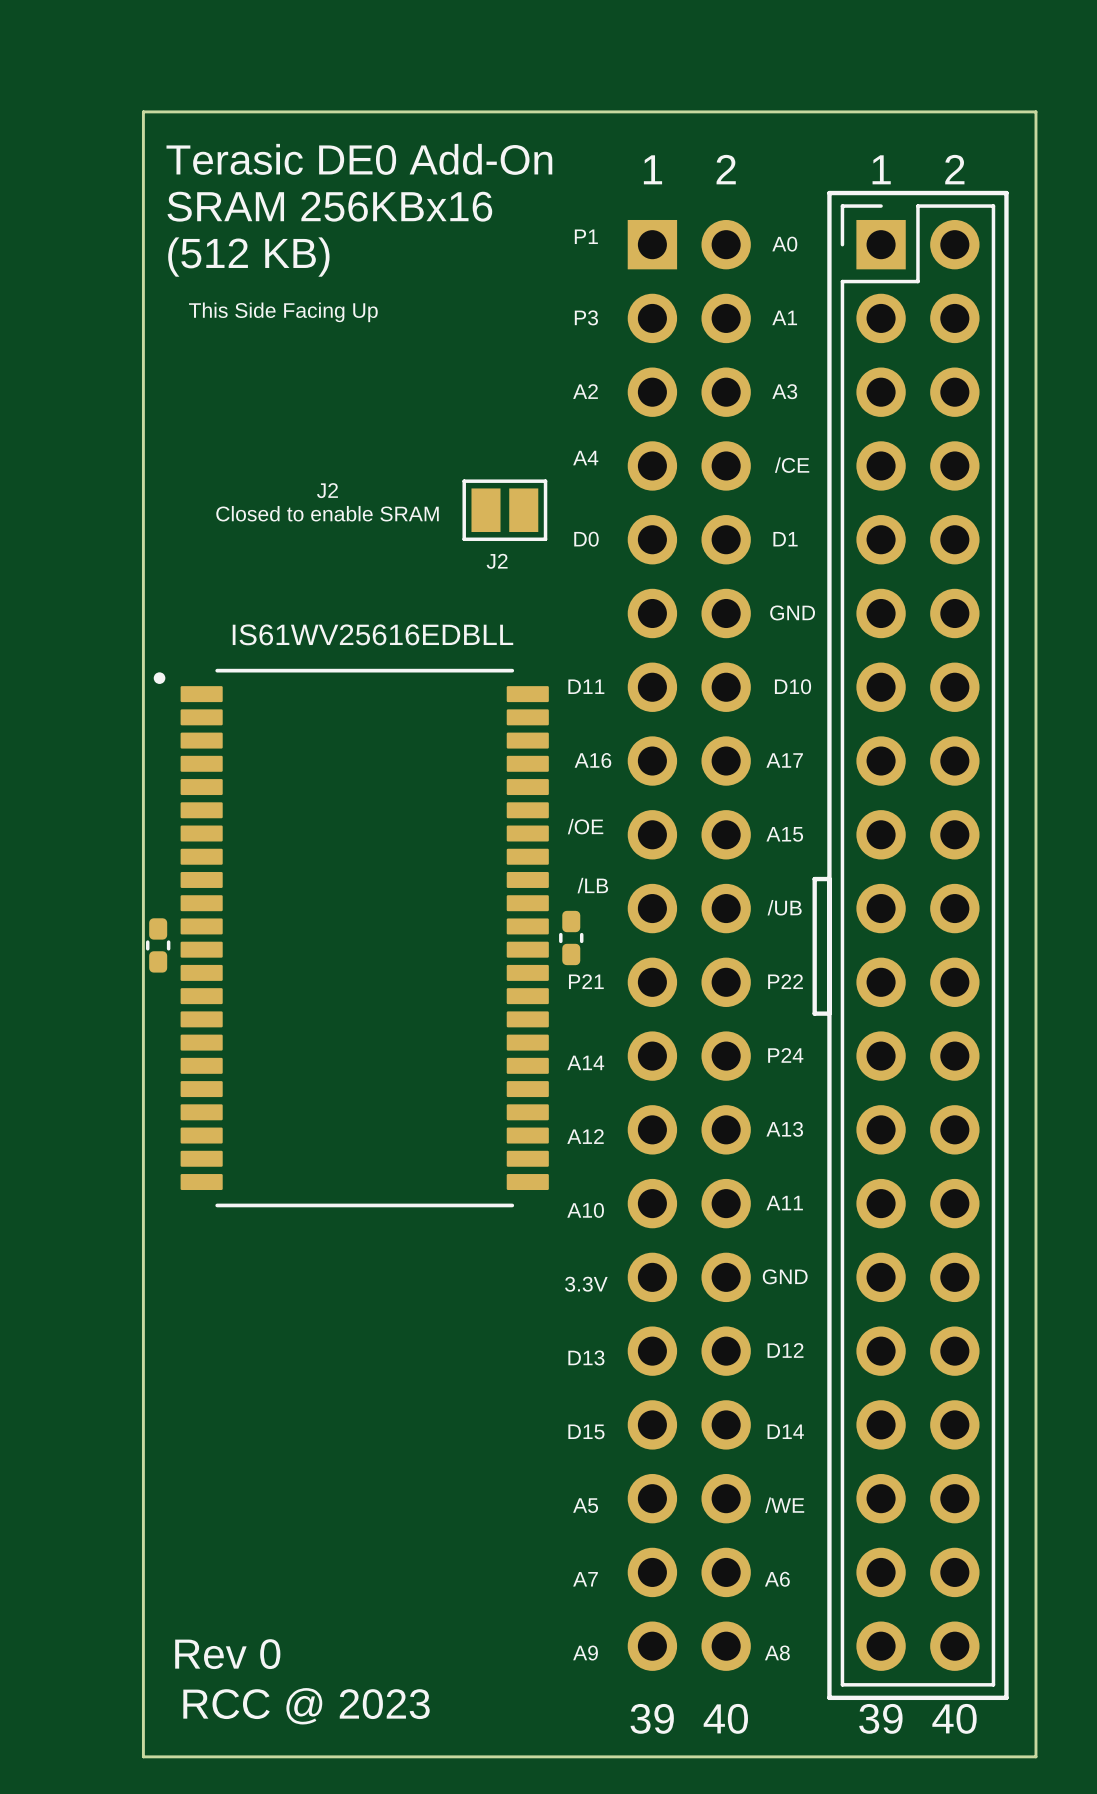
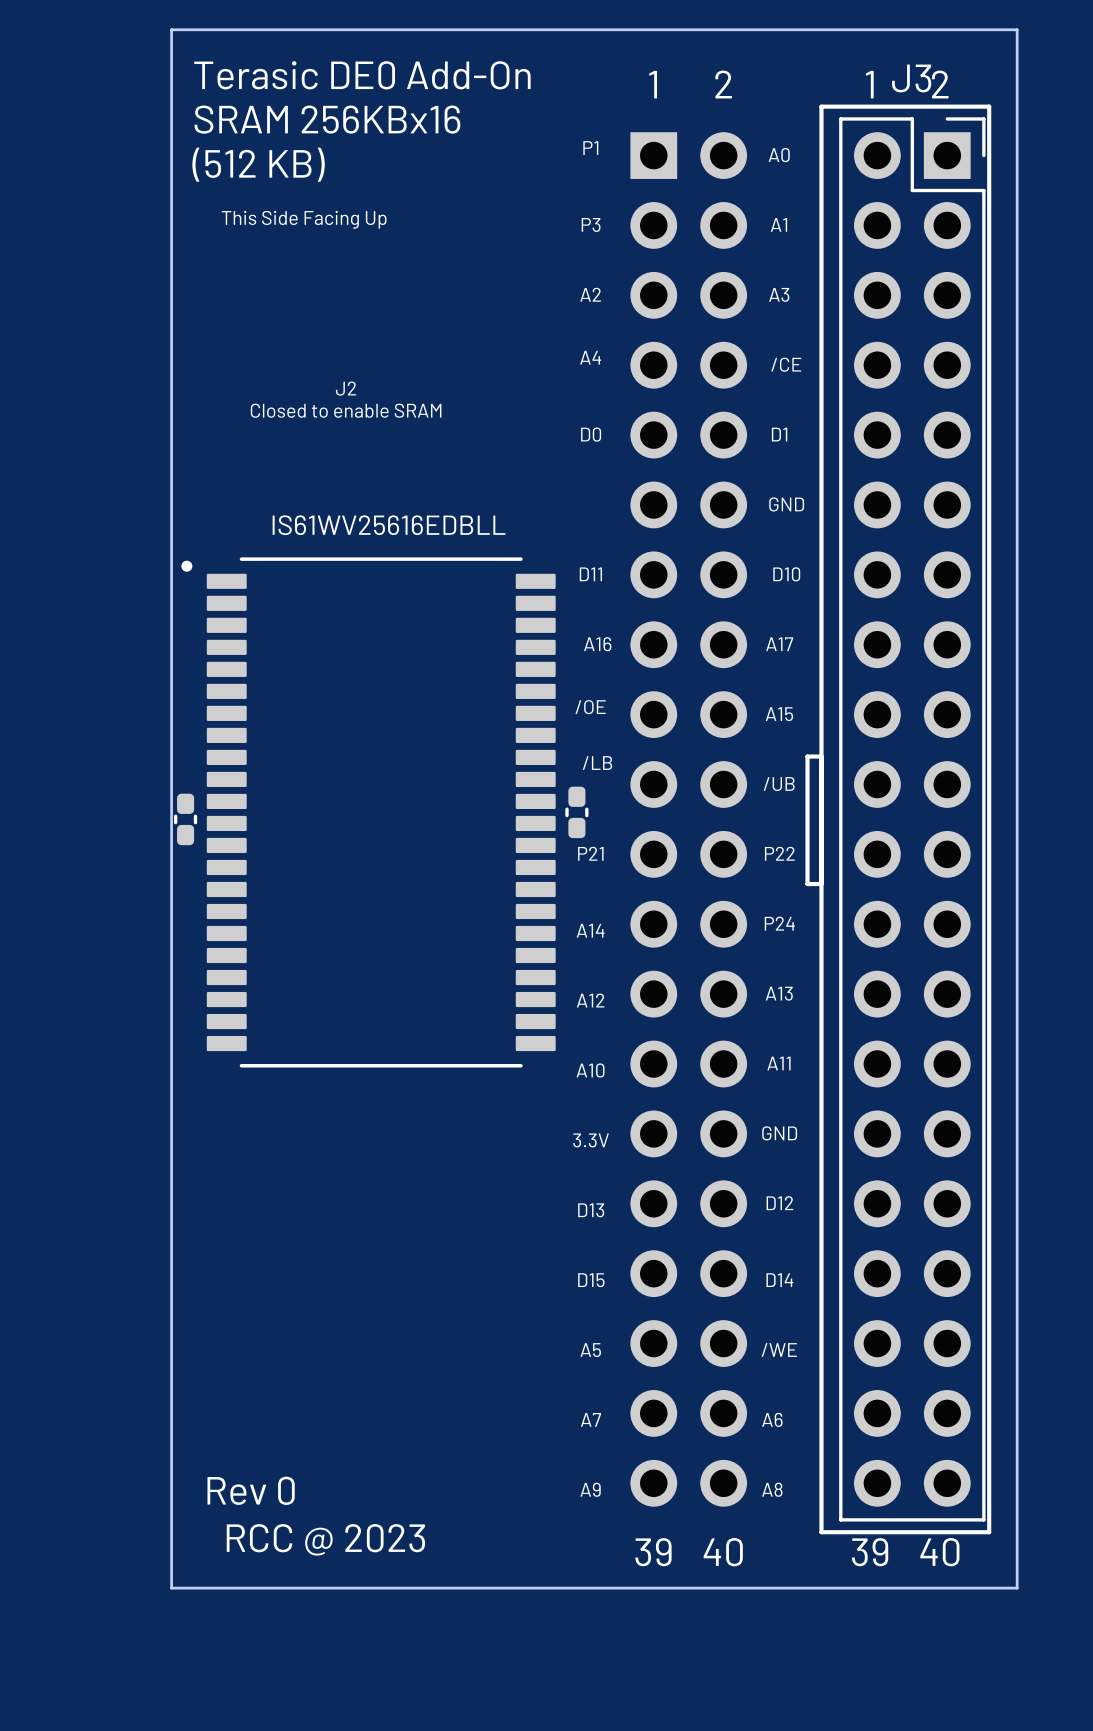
J2: (504, 510) -> none
part: (917, 945) -> none
J3: none -> (912, 819)

